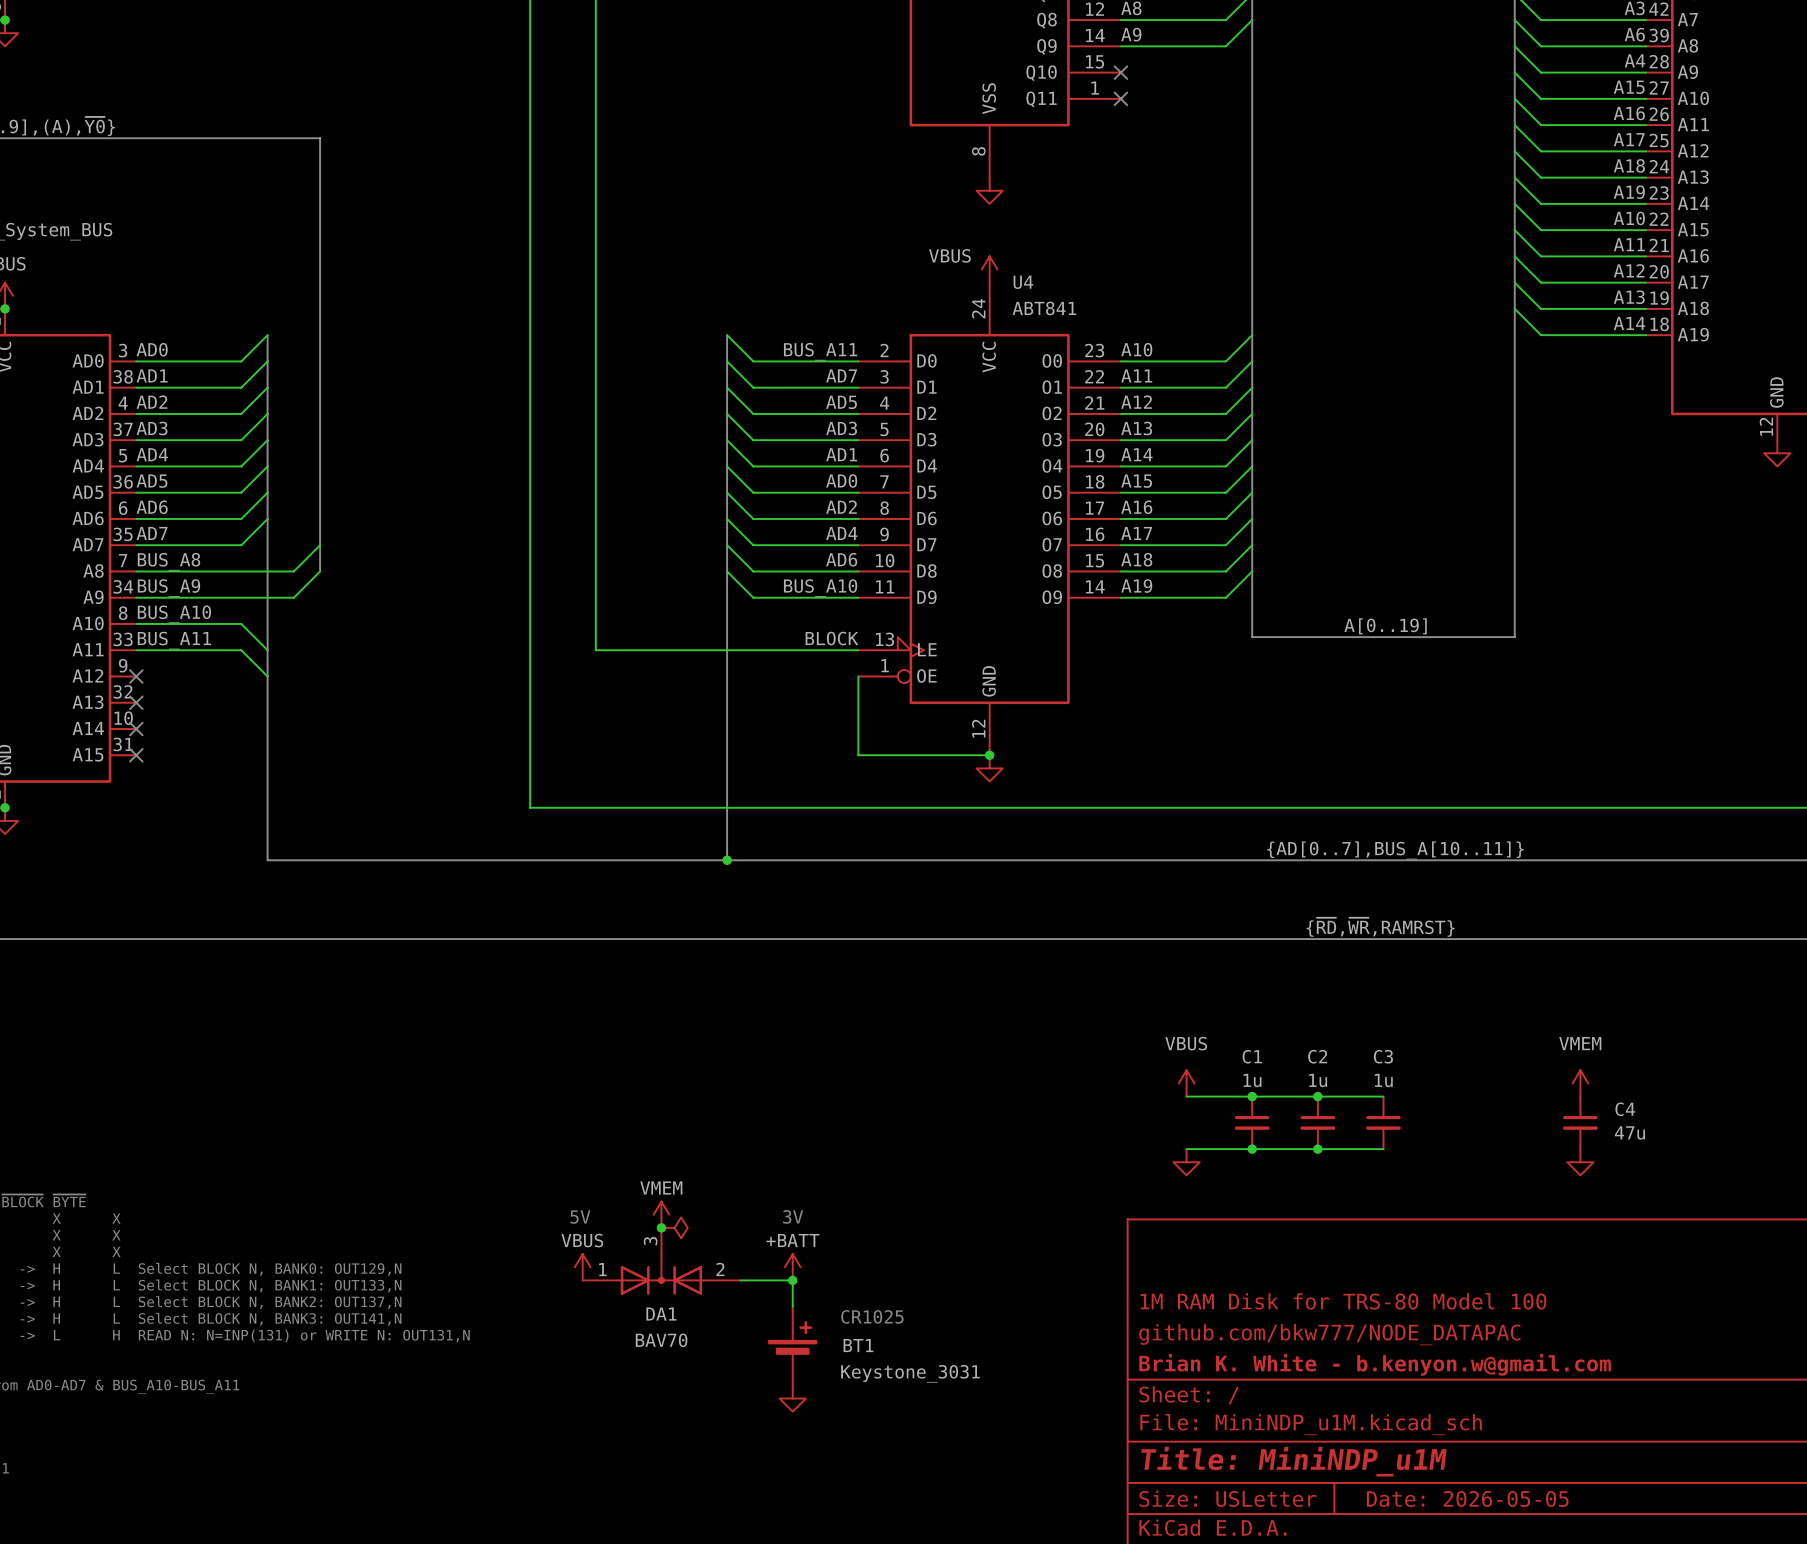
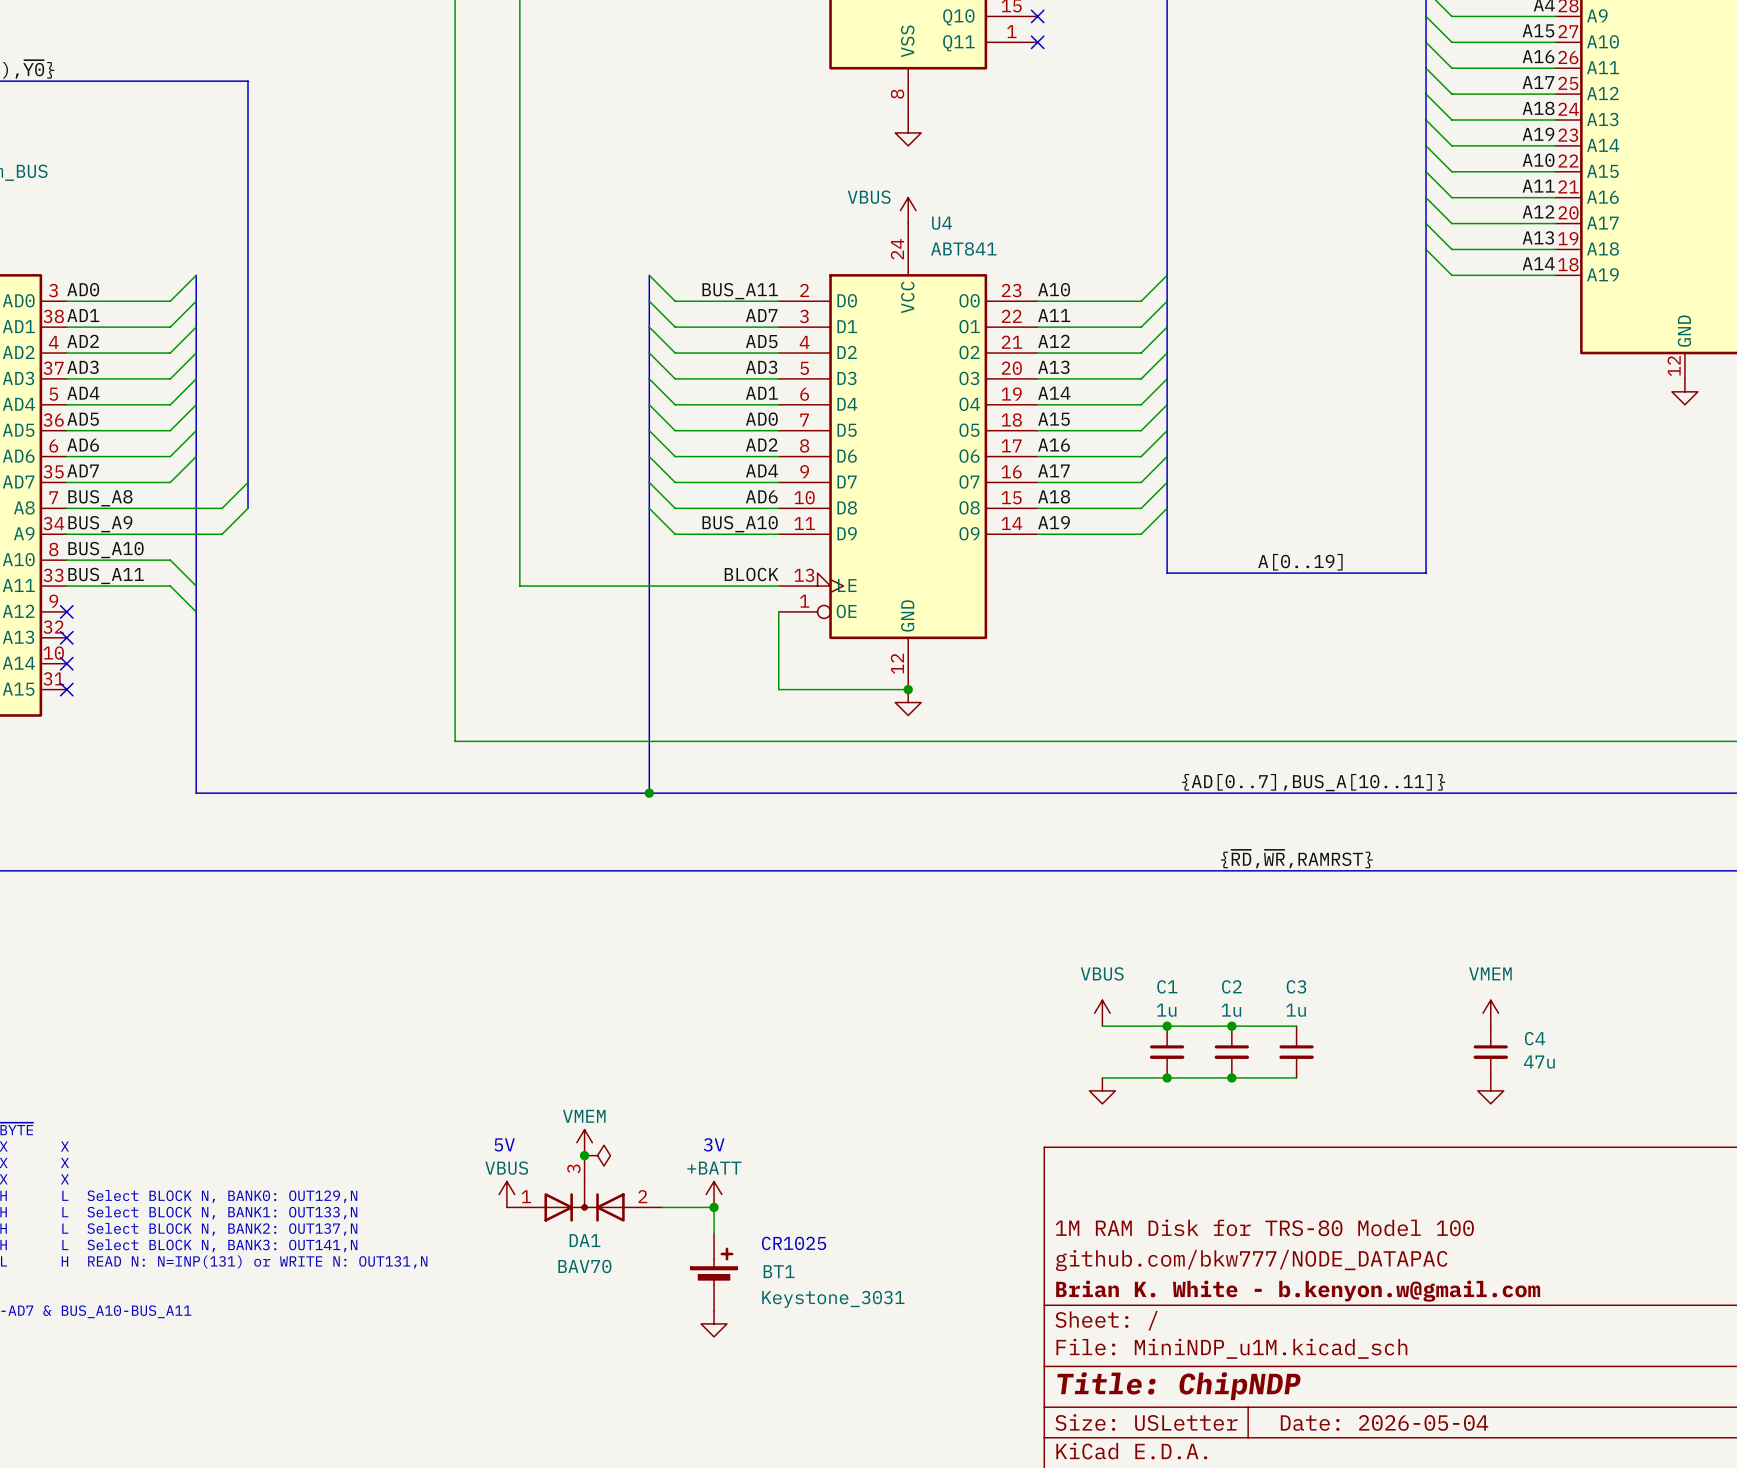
title block: Title: MiniNDP_u1M (1294, 1461) -> Title: ChipNDP (1178, 1386)
title block: Date: 2026-05-05 (1467, 1498) -> Date: 2026-05-04 (1384, 1422)

